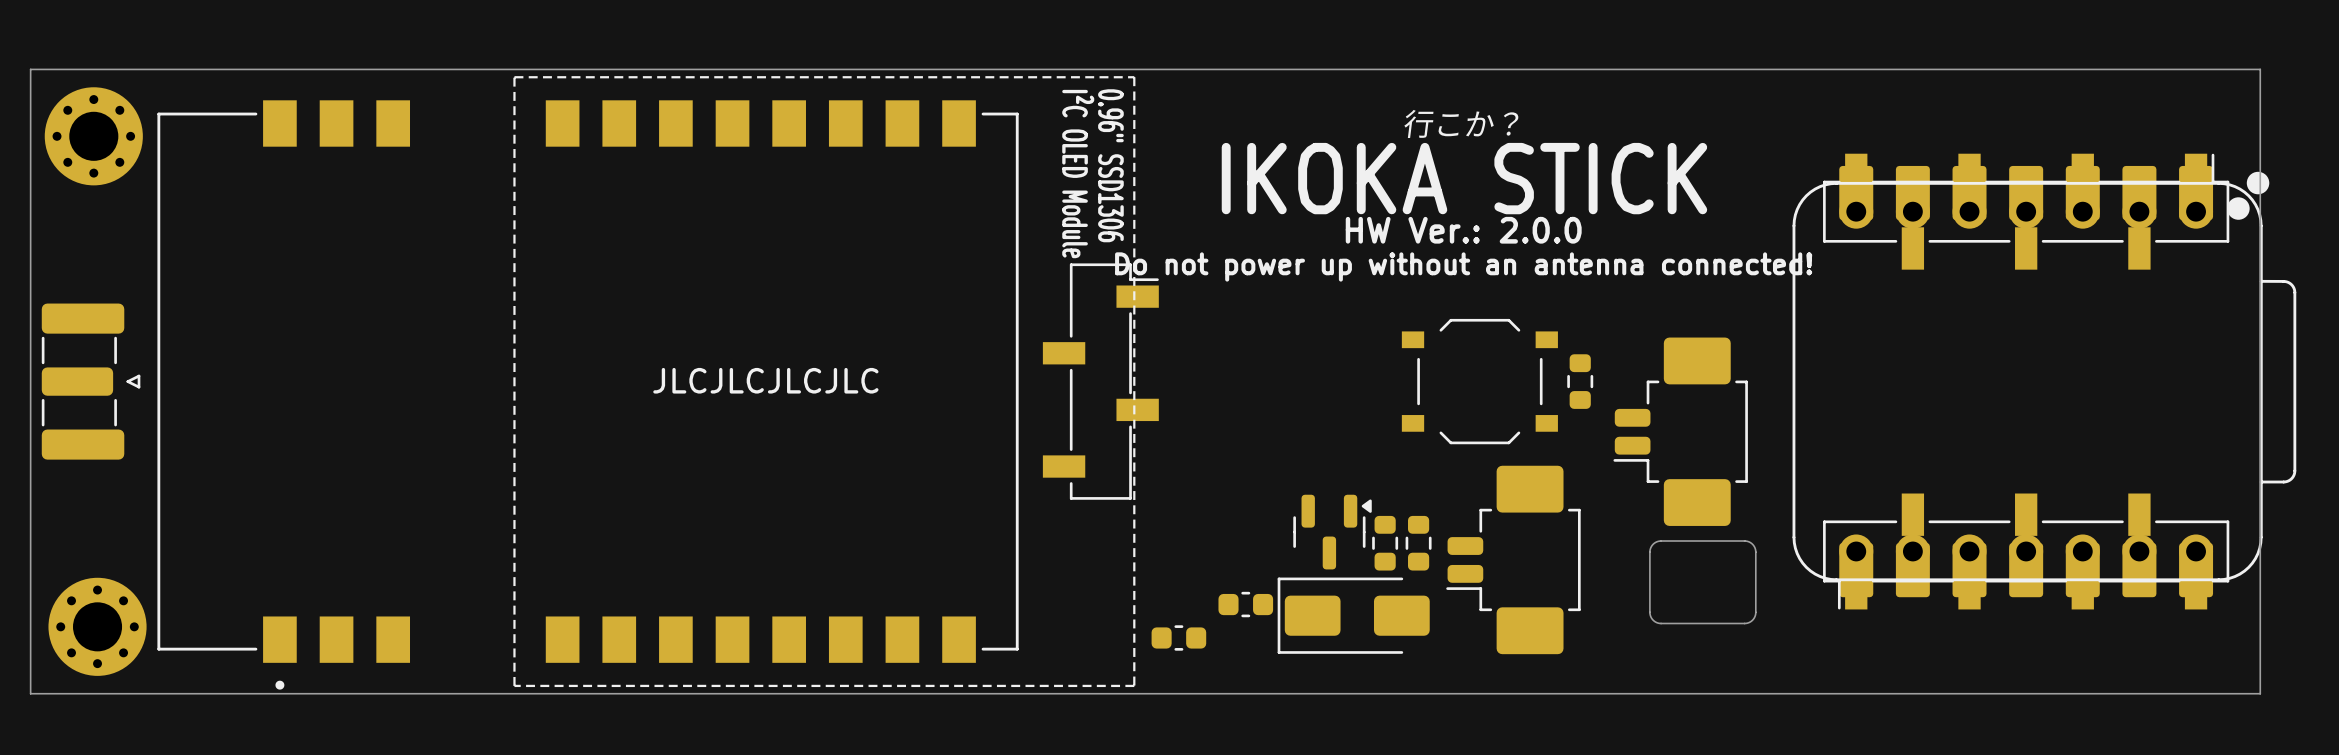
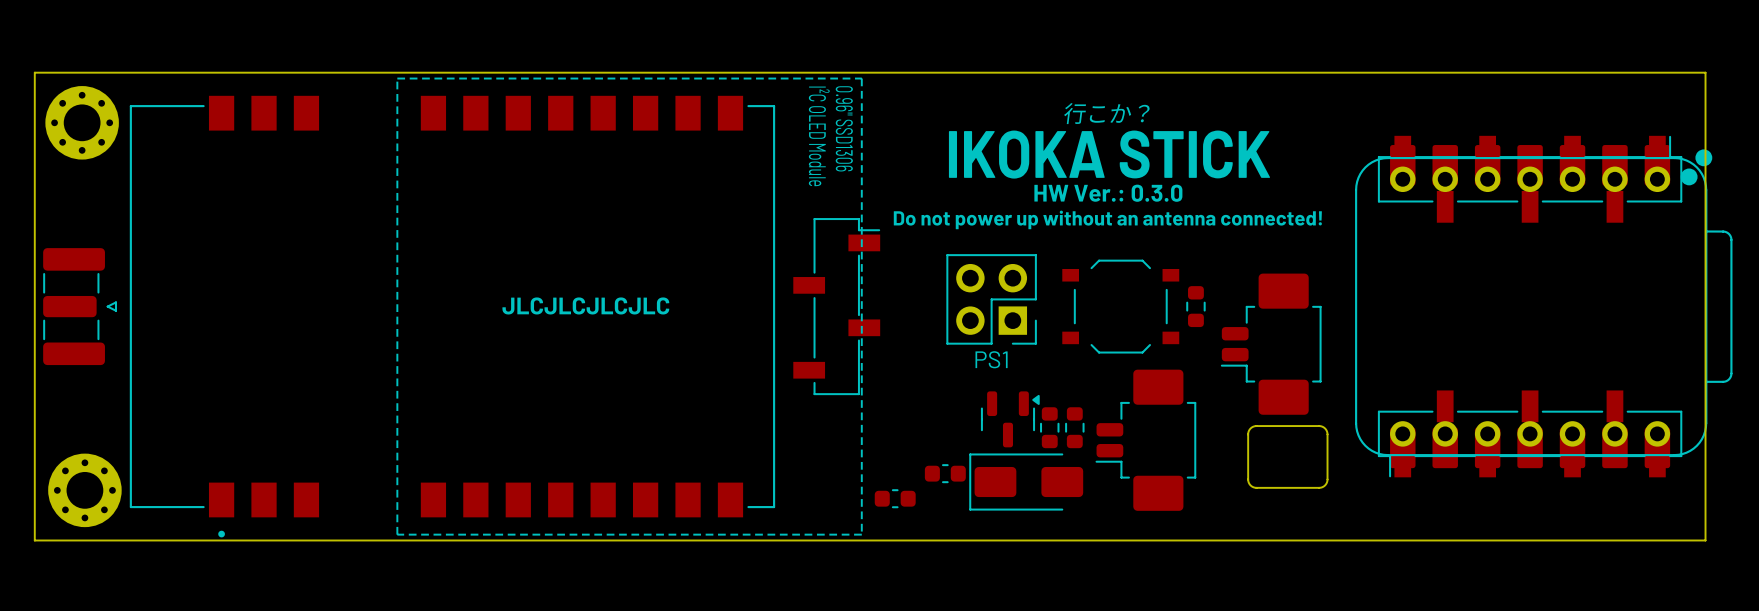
text: HW Ver.: 2.0.0 (1463, 230) -> HW Ver.: 0.3.0 (1108, 193)
PS1: none -> (991, 299)

